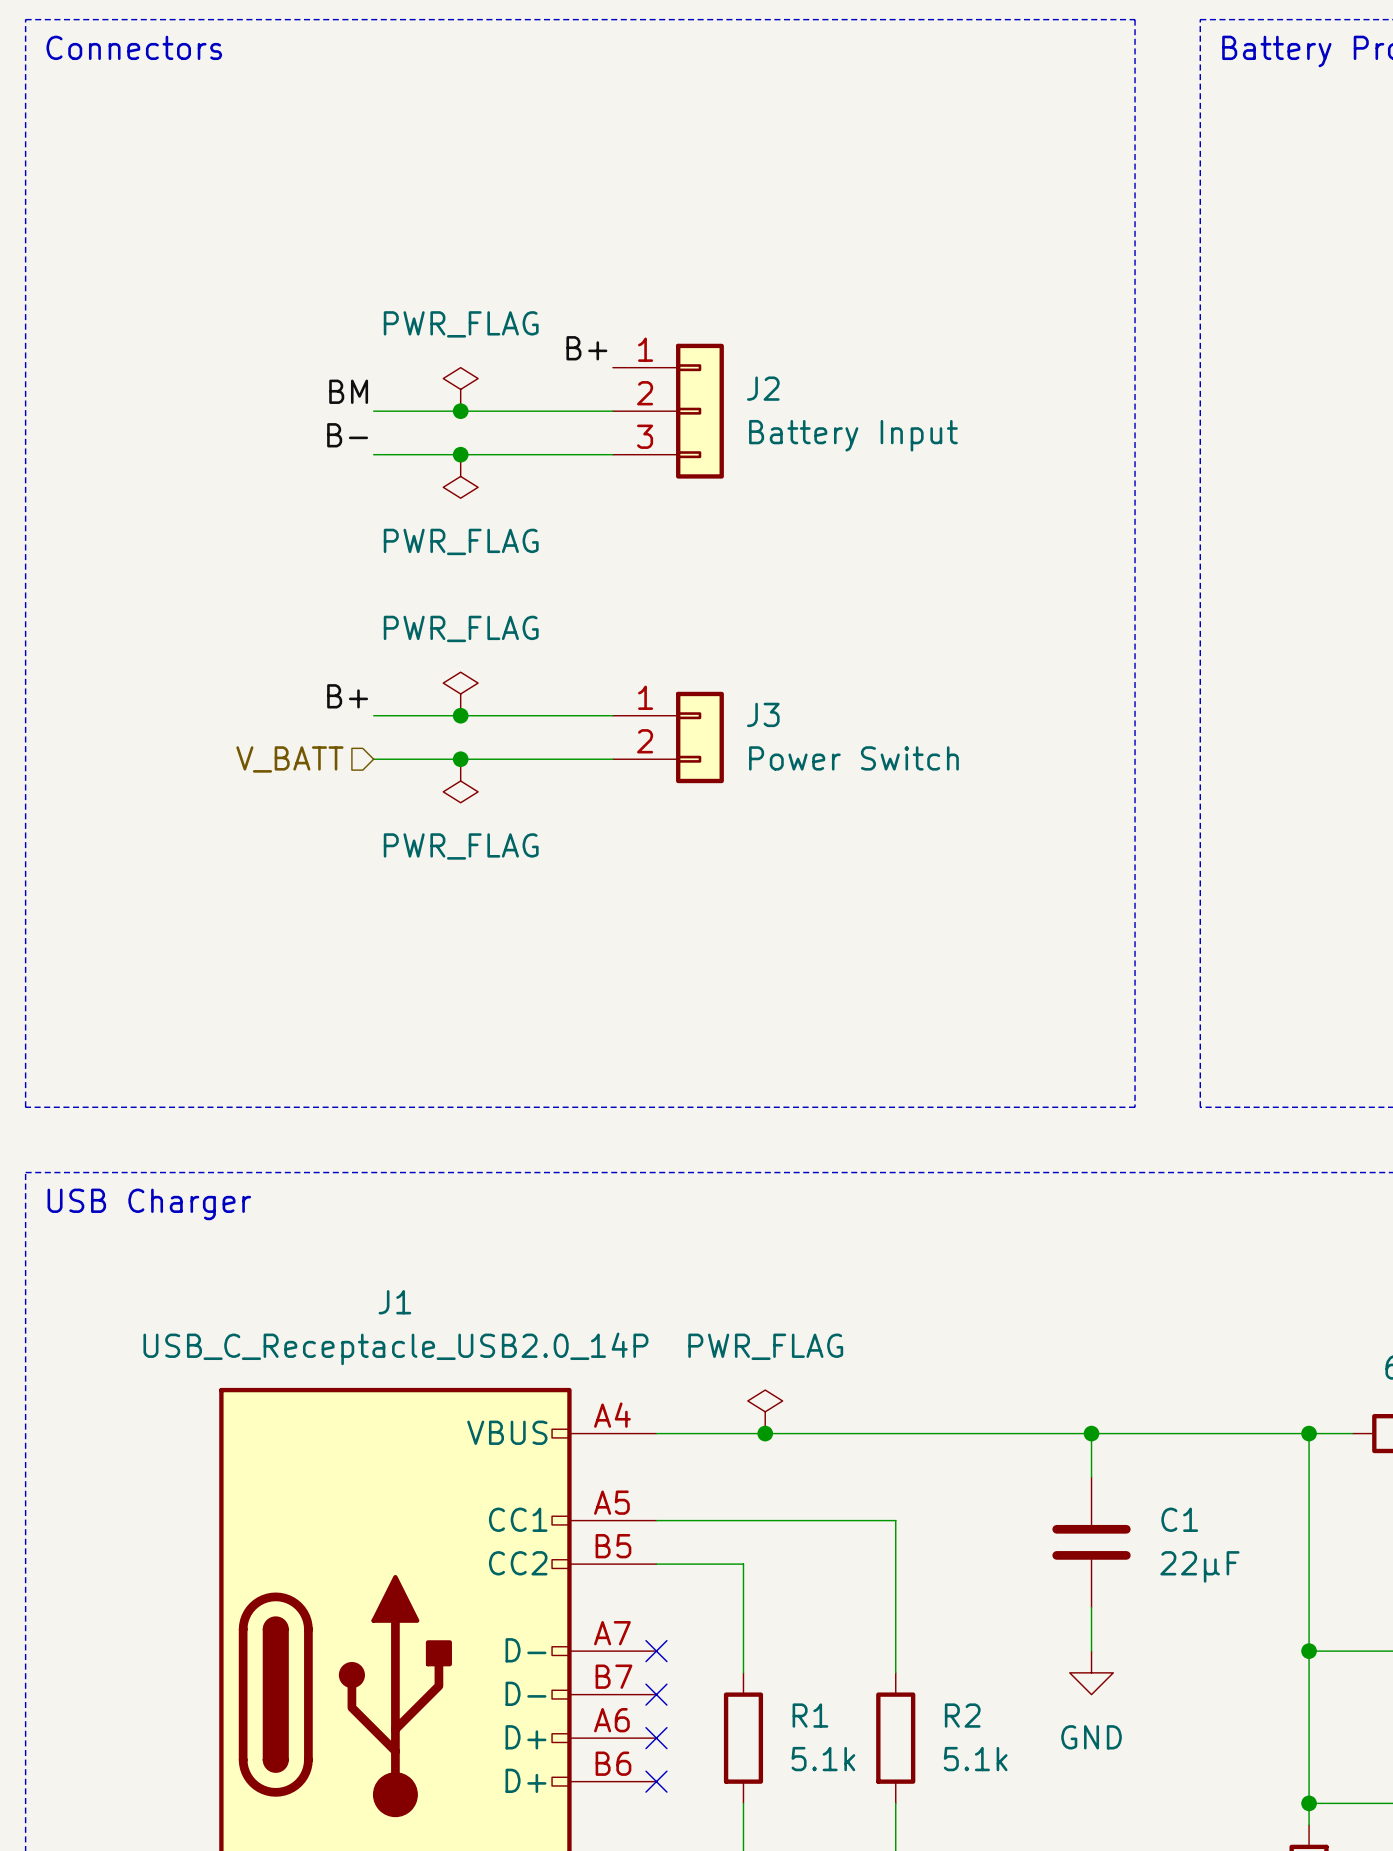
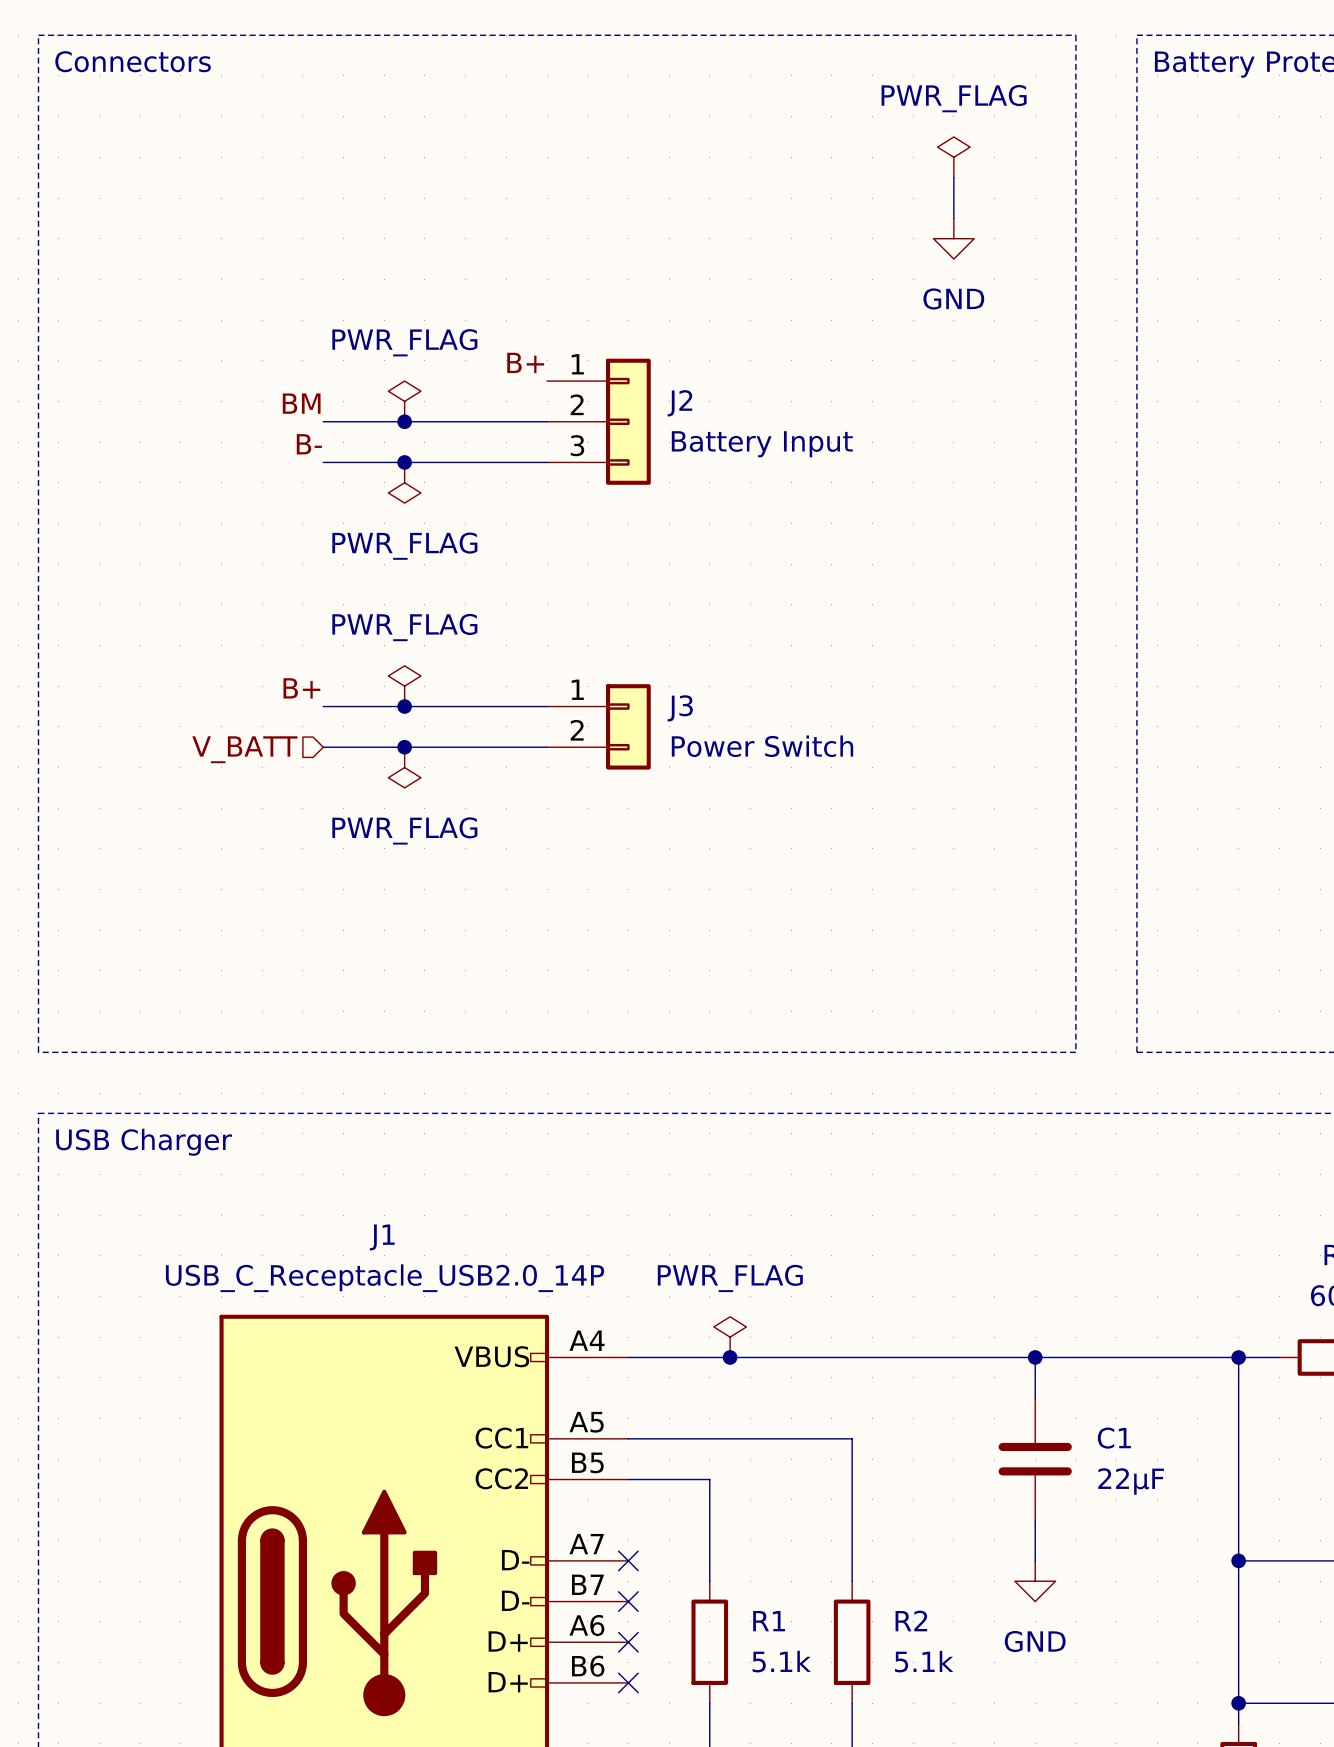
power symbol: none -> PWR_FLAG (953, 157)
wire: none -> (953, 177) (953, 218)
power symbol: none -> GND (953, 238)
label position: B+ (586, 348) -> B+ (525, 362)
power symbol: PWR_FLAG (460, 389) -> none
label position: BM (348, 391) -> BM (301, 403)
wire: (373, 411) (612, 411) -> (323, 421) (547, 421)
power symbol: none -> PWR_FLAG (404, 401)
junction: (460, 411) -> none
J2 position: (668, 411) -> (598, 421)
junction: none -> (404, 421)
label position: B- (347, 435) -> B- (309, 444)
wire: (373, 454) (612, 454) -> (323, 462) (547, 462)
junction: (460, 454) -> none
junction: none -> (404, 462)
power symbol: PWR_FLAG (460, 476) -> none
power symbol: none -> PWR_FLAG (404, 482)
power symbol: PWR_FLAG (460, 693) -> none
label position: B+ (347, 696) -> B+ (301, 688)
wire: (373, 715) (612, 715) -> (323, 706) (547, 706)
power symbol: none -> PWR_FLAG (404, 686)
junction: (460, 715) -> none
junction: none -> (404, 706)
J3 position: (668, 737) -> (598, 726)
hierarchical label position: V_BATT (289, 759) -> V_BATT (244, 749)
wire: (373, 759) (612, 759) -> (323, 747) (547, 747)
junction: (460, 759) -> none
junction: none -> (404, 747)
power symbol: PWR_FLAG (460, 780) -> none
power symbol: none -> PWR_FLAG (404, 767)

